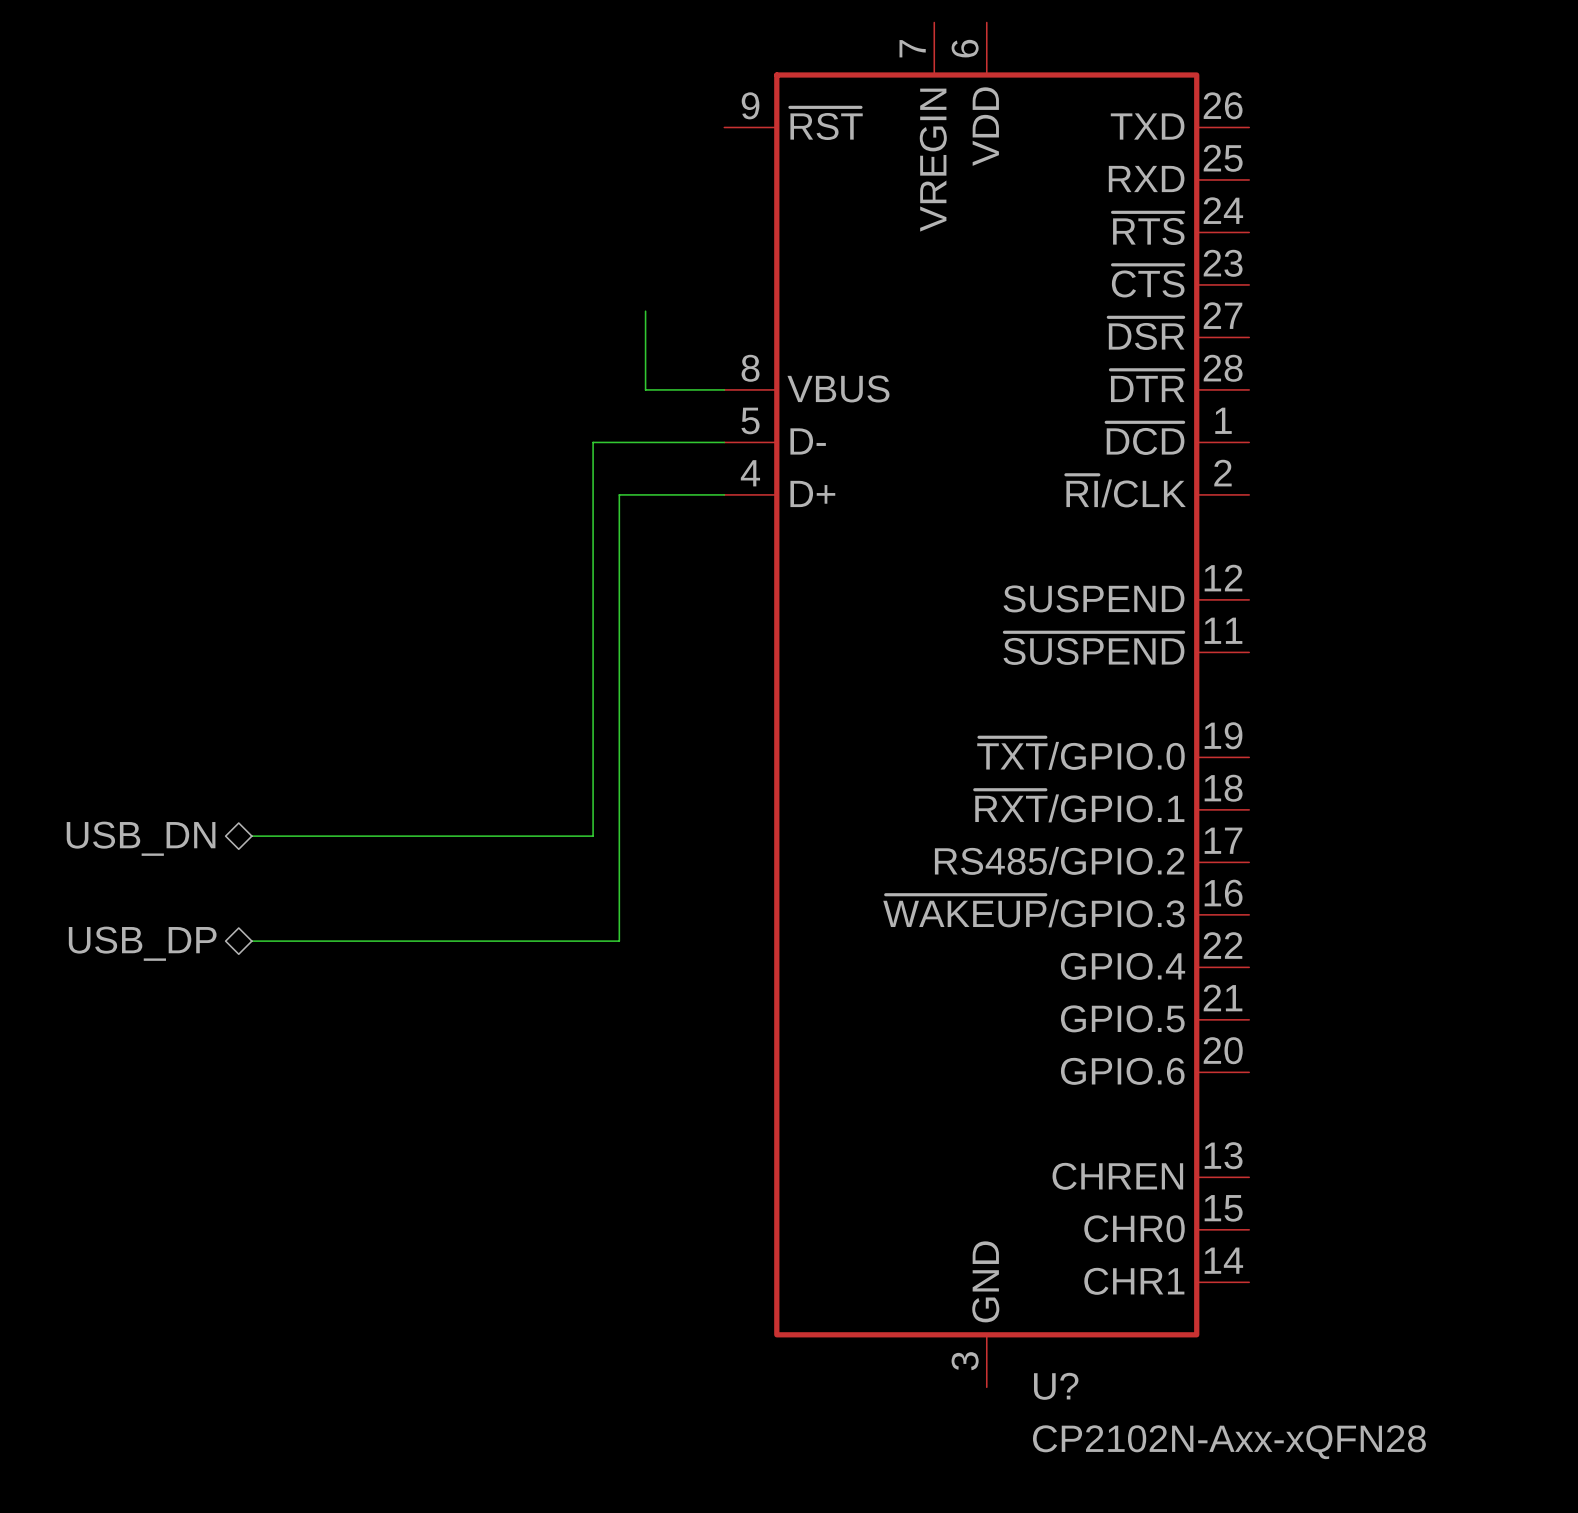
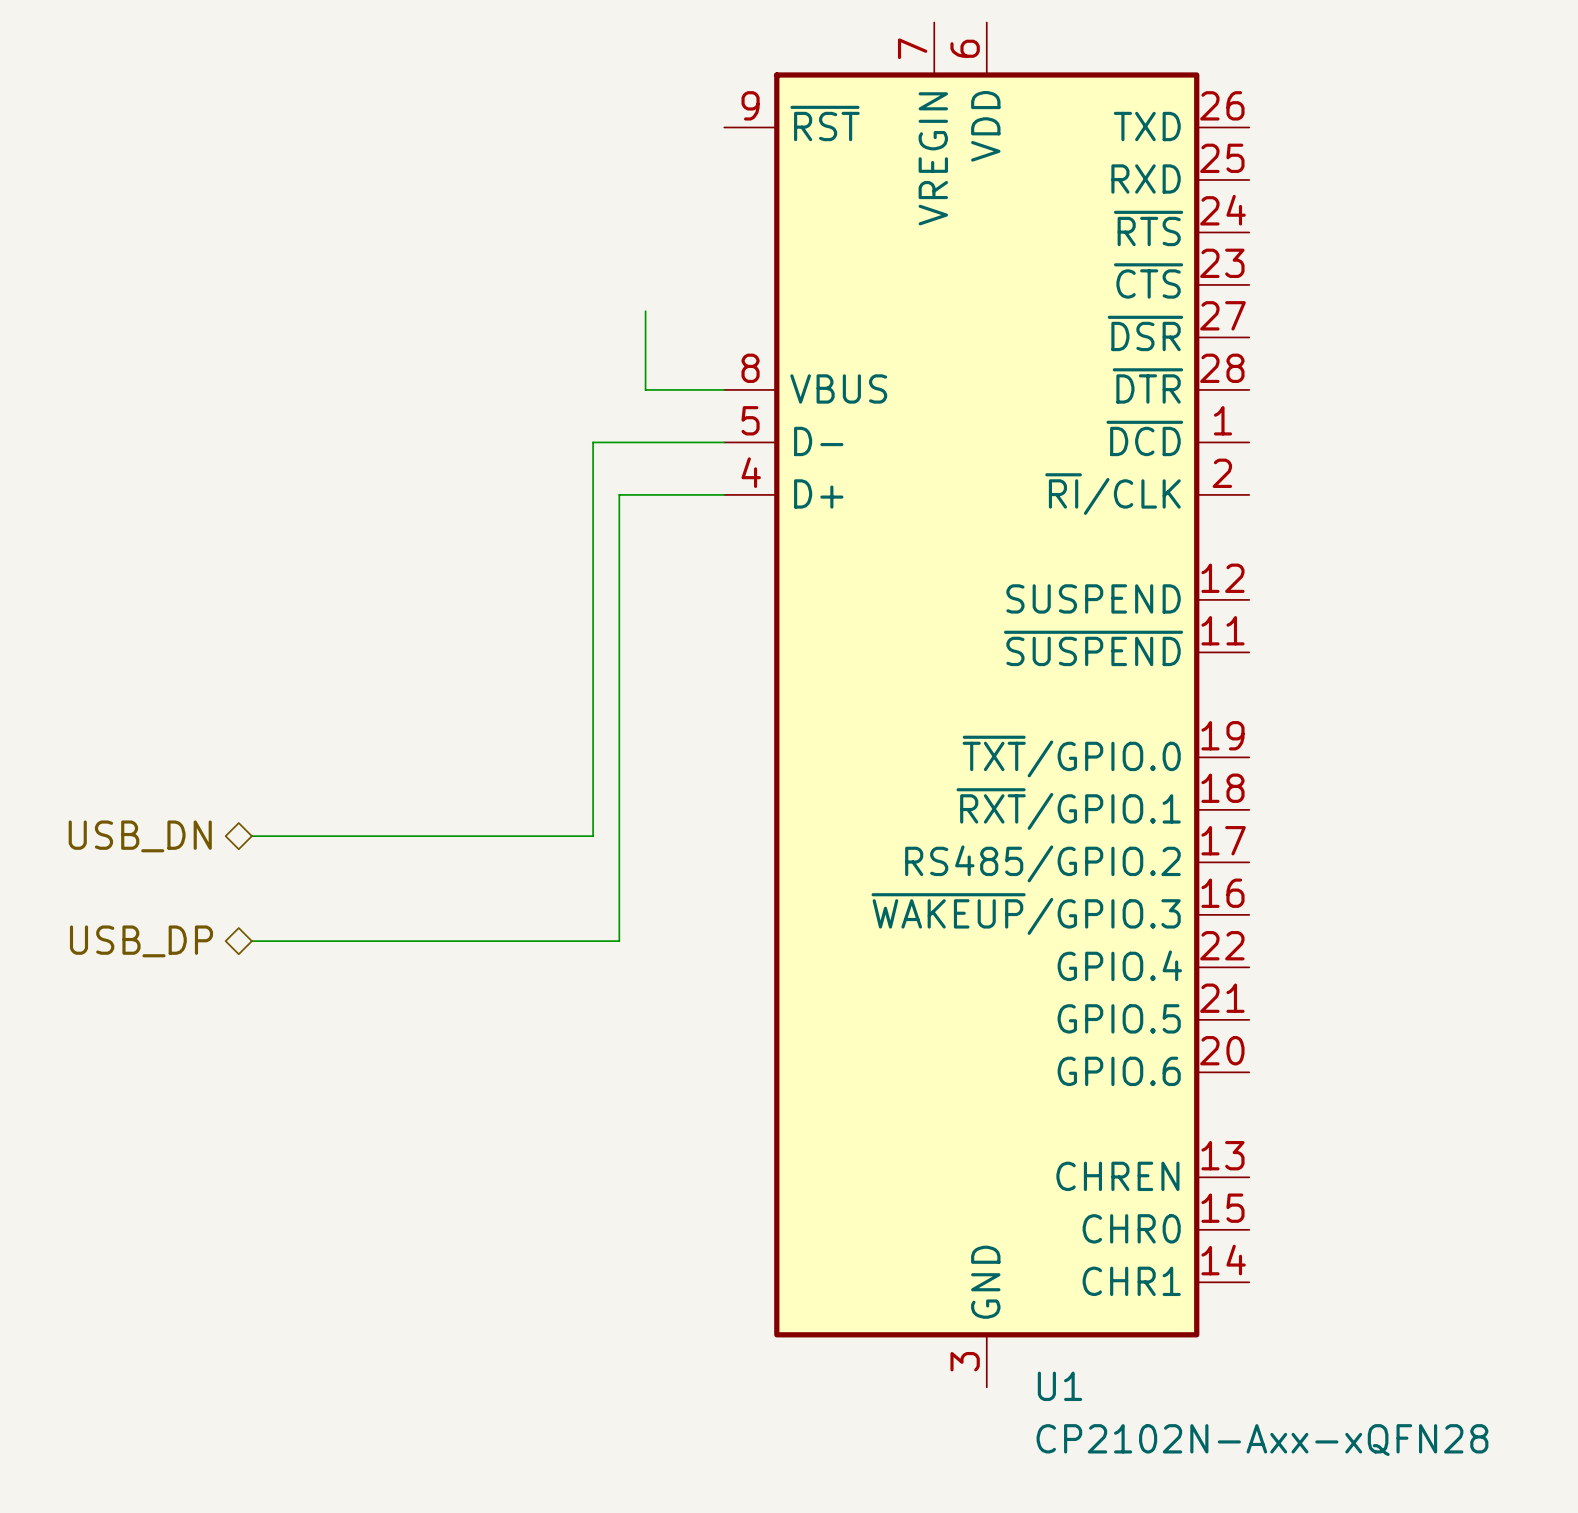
U? name: U? (1056, 1386) -> U1 (1060, 1386)

